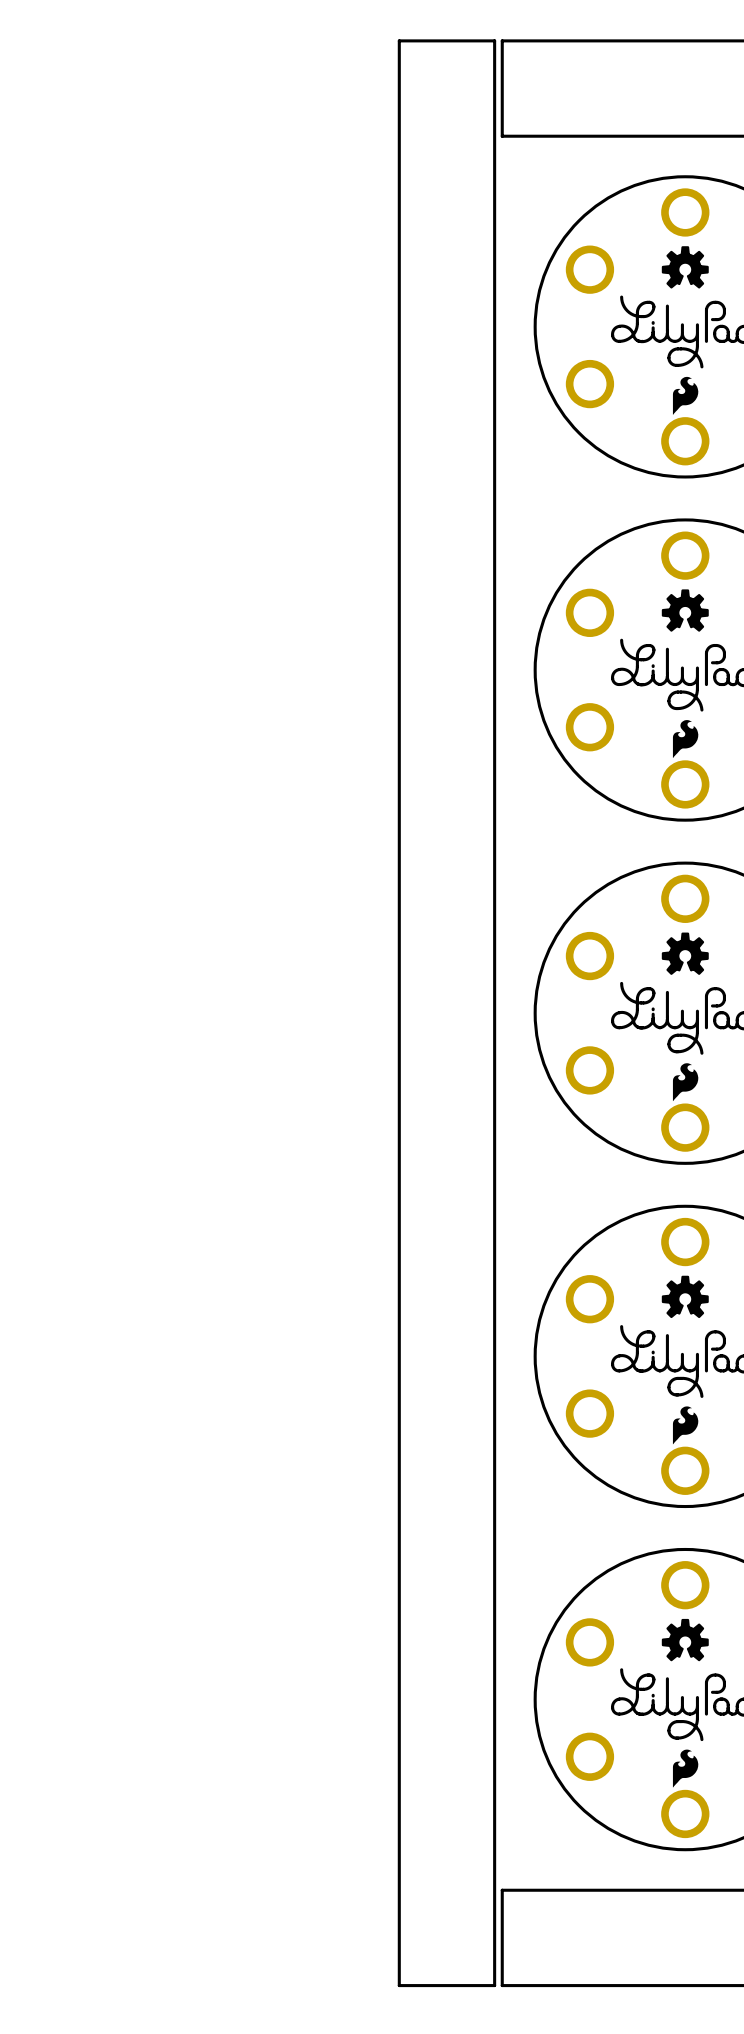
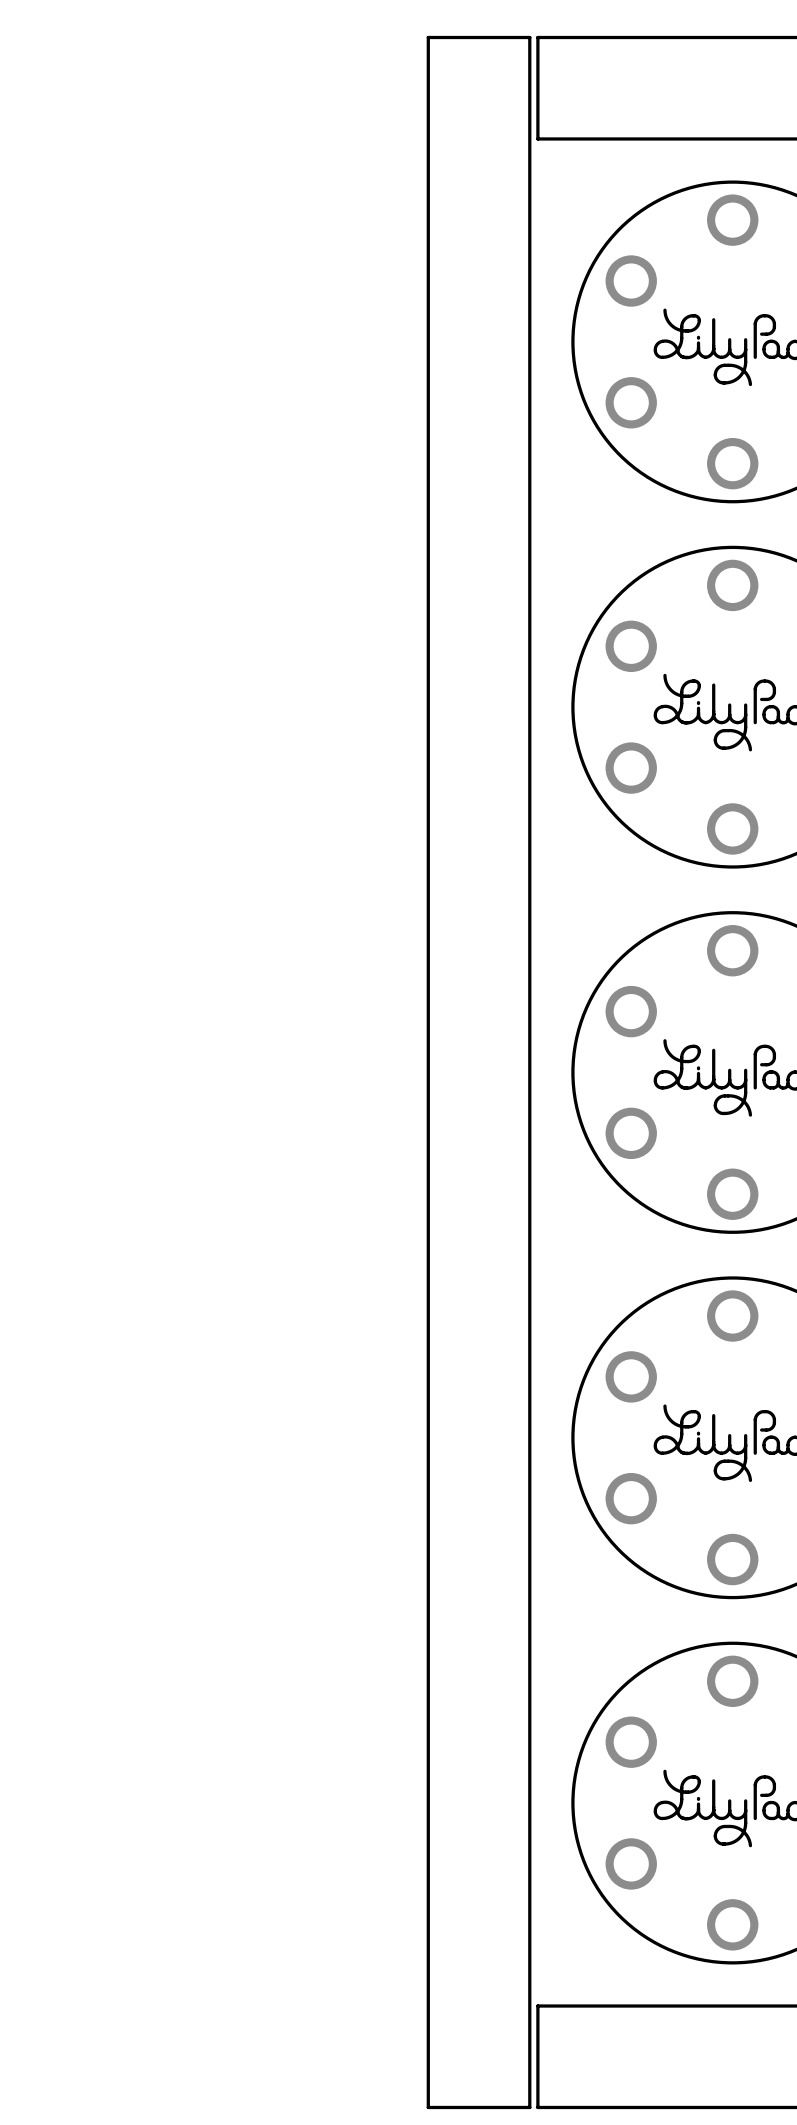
drawing: [661, 246, 709, 289] -> none
drawing: [672, 376, 699, 416] -> none
drawing: [661, 589, 709, 632] -> none
drawing: [672, 720, 699, 759] -> none
drawing: [661, 932, 709, 975] -> none
drawing: [672, 1063, 699, 1102] -> none
drawing: [661, 1275, 709, 1319] -> none
drawing: [672, 1406, 699, 1445] -> none
drawing: [661, 1618, 709, 1662] -> none
drawing: [672, 1749, 699, 1788] -> none

